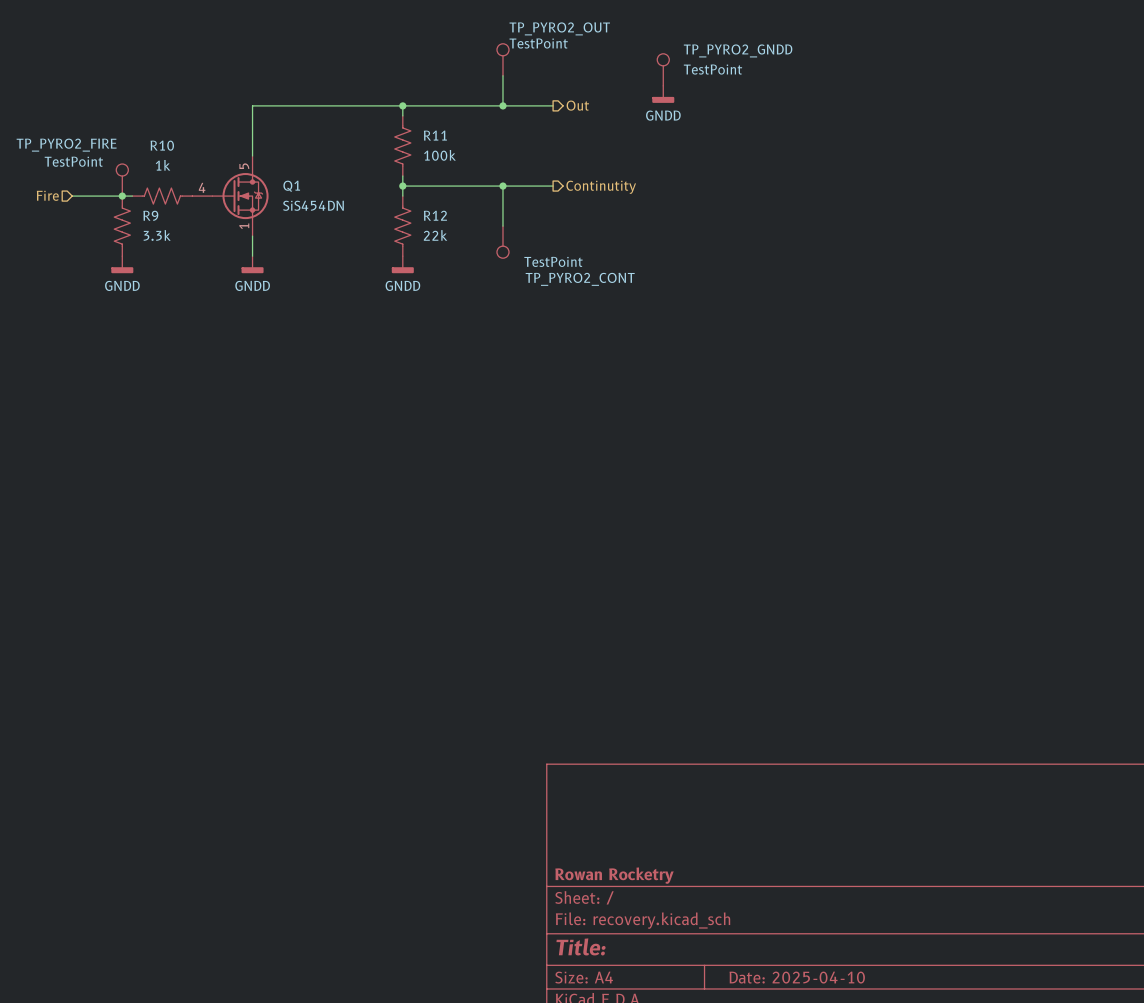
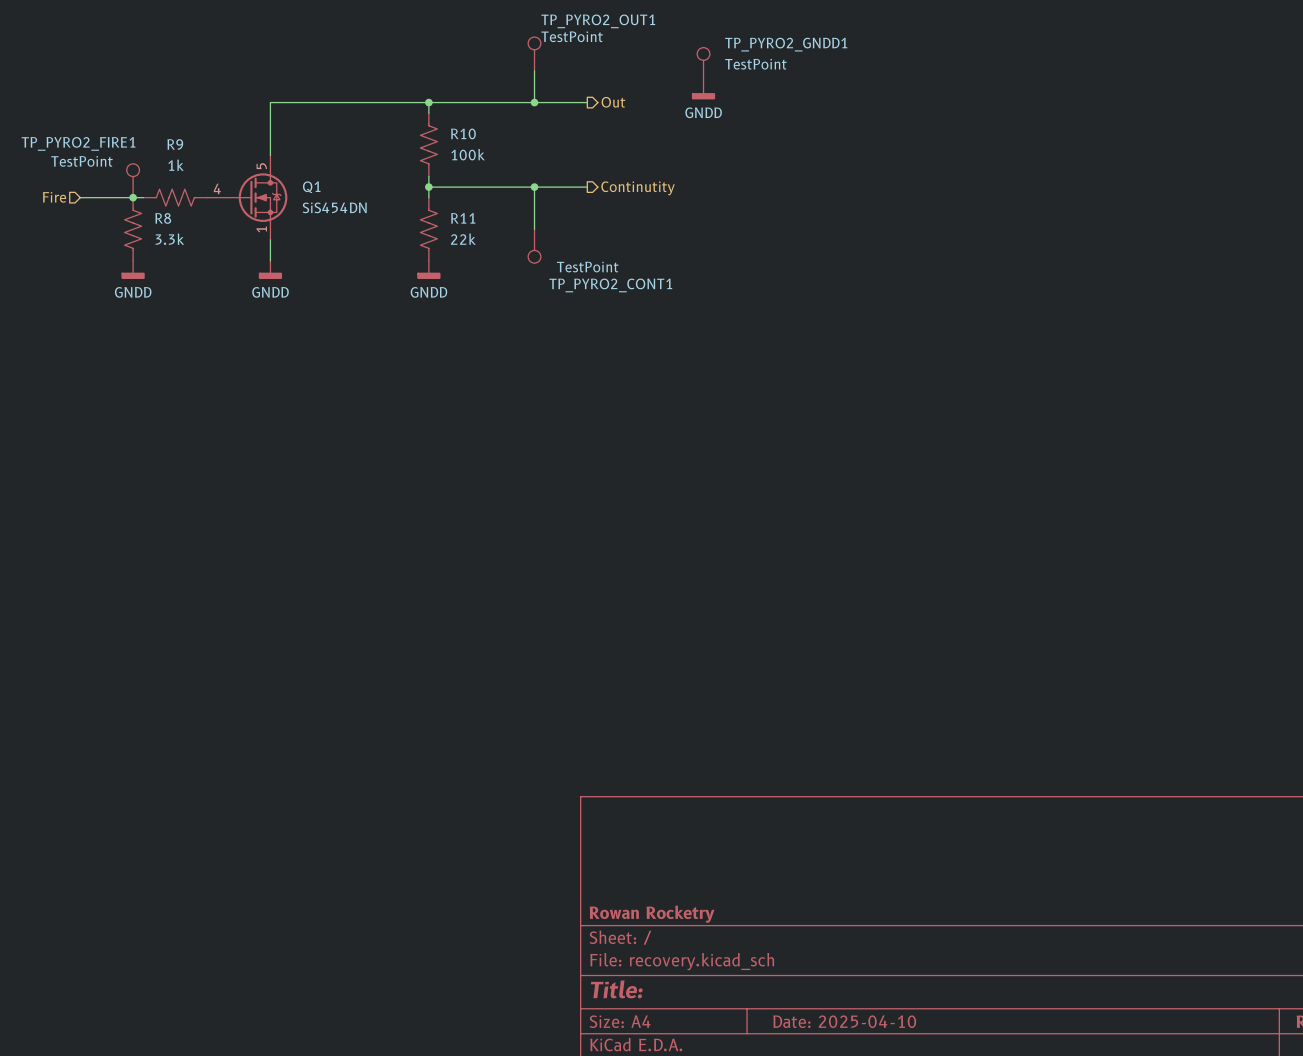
TP_PYRO2_OUT name: TP_PYRO2_OUT (559, 28) -> TP_PYRO2_OUT1 (598, 21)
TP_PYRO2_GNDD name: TP_PYRO2_GNDD (738, 50) -> TP_PYRO2_GNDD1 (786, 44)
R11 name: R11 (435, 135) -> R10 (463, 133)
TP_PYRO2_FIRE name: TP_PYRO2_FIRE (66, 145) -> TP_PYRO2_FIRE1 (78, 143)
R10 name: R10 (162, 145) -> R9 (175, 144)
R9 name: R9 (150, 215) -> R8 (163, 218)
R12 name: R12 (435, 215) -> R11 (463, 218)
TP_PYRO2_CONT name: TP_PYRO2_CONT (580, 279) -> TP_PYRO2_CONT1 (610, 285)

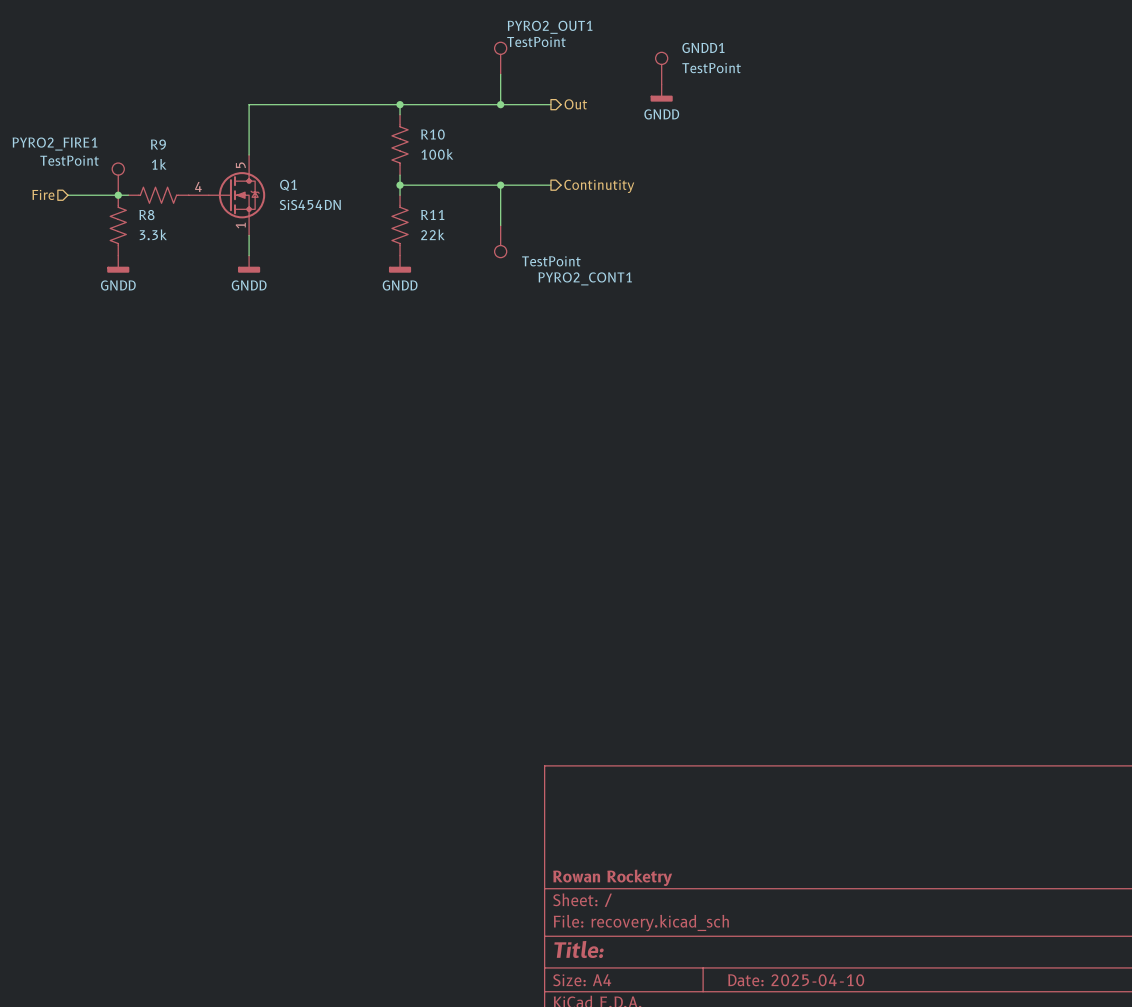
TP_PYRO2_OUT1 name: TP_PYRO2_OUT1 (598, 21) -> PYRO2_OUT1 (550, 27)
TP_PYRO2_GNDD1 name: TP_PYRO2_GNDD1 (786, 44) -> GNDD1 (703, 47)
TP_PYRO2_FIRE1 name: TP_PYRO2_FIRE1 (78, 143) -> PYRO2_FIRE1 (54, 144)
TP_PYRO2_CONT1 name: TP_PYRO2_CONT1 (610, 285) -> PYRO2_CONT1 (585, 278)

